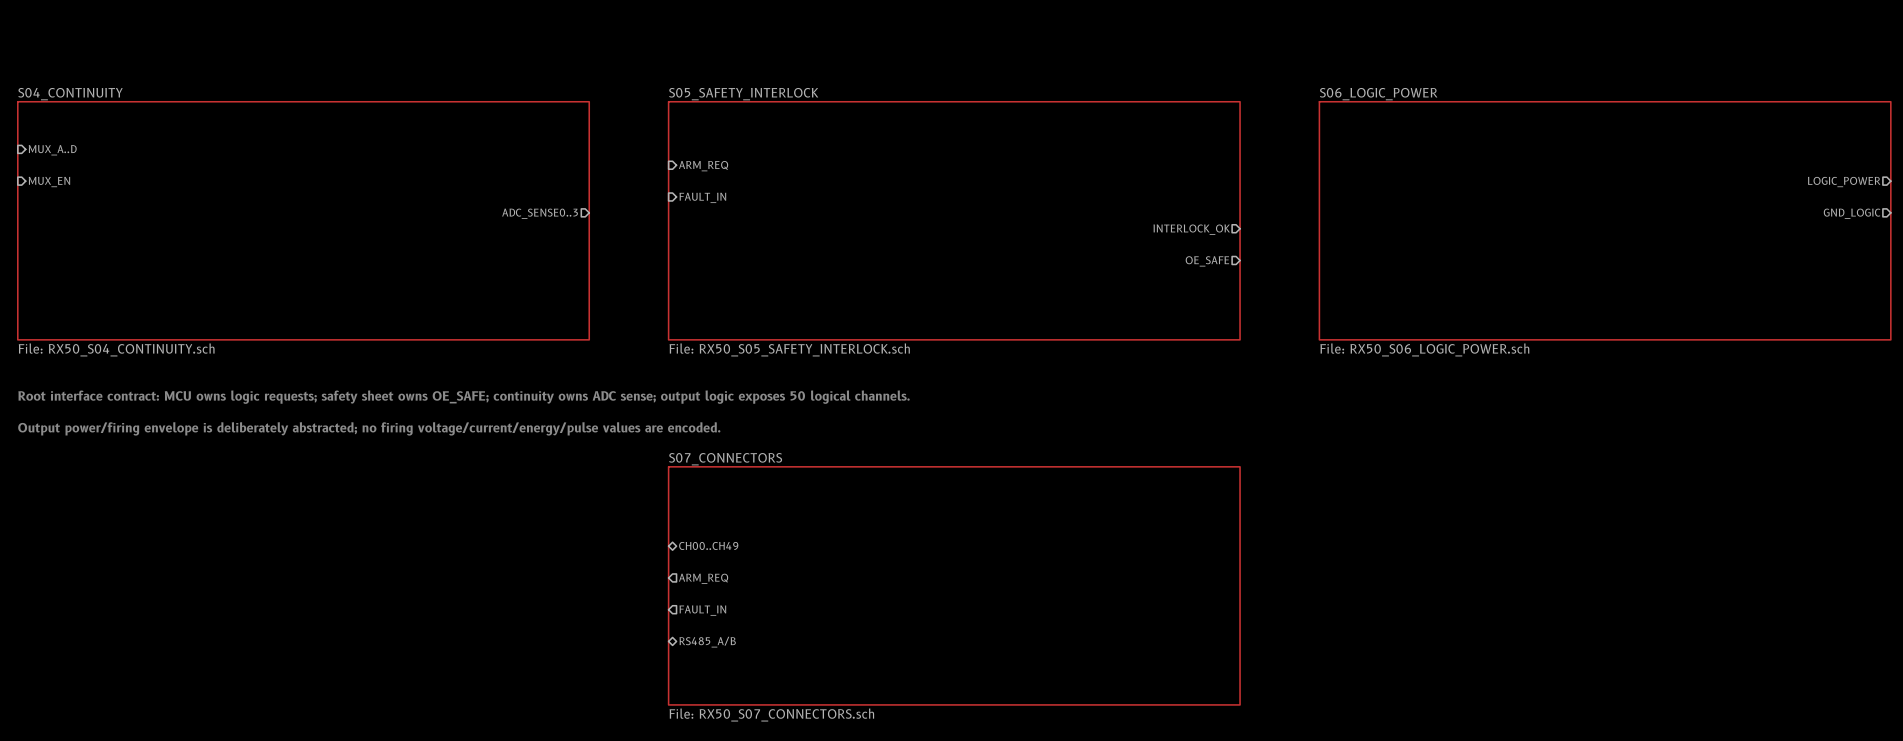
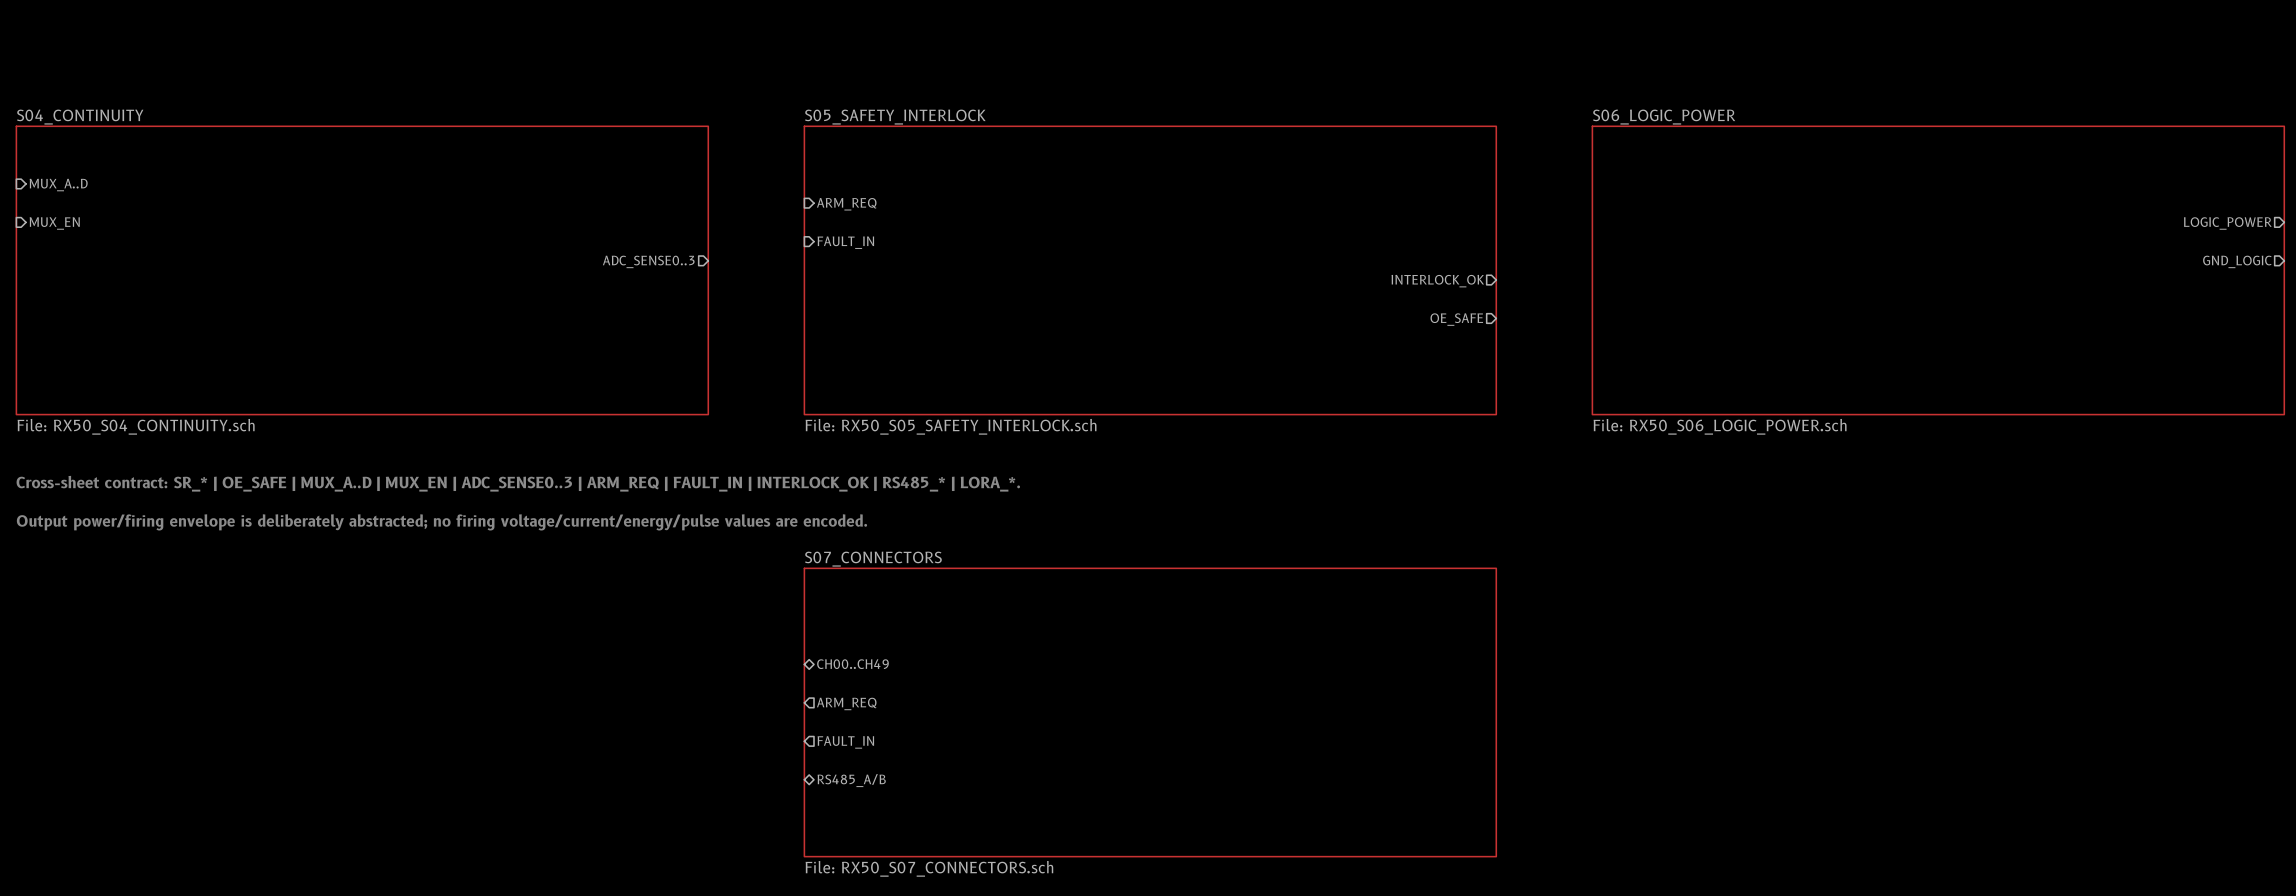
text: Root interface contract: MCU owns logic requests; safety sheet owns OE_SAFE; continuity owns ADC sense; output logic exposes 50 logical channels. (464, 397) -> Cross-sheet contract: SR_* | OE_SAFE | MUX_A..D | MUX_EN | ADC_SENSE0..3 | ARM_REQ | FAULT_IN | INTERLOCK_OK | RS485_* | LORA_*. (518, 483)

